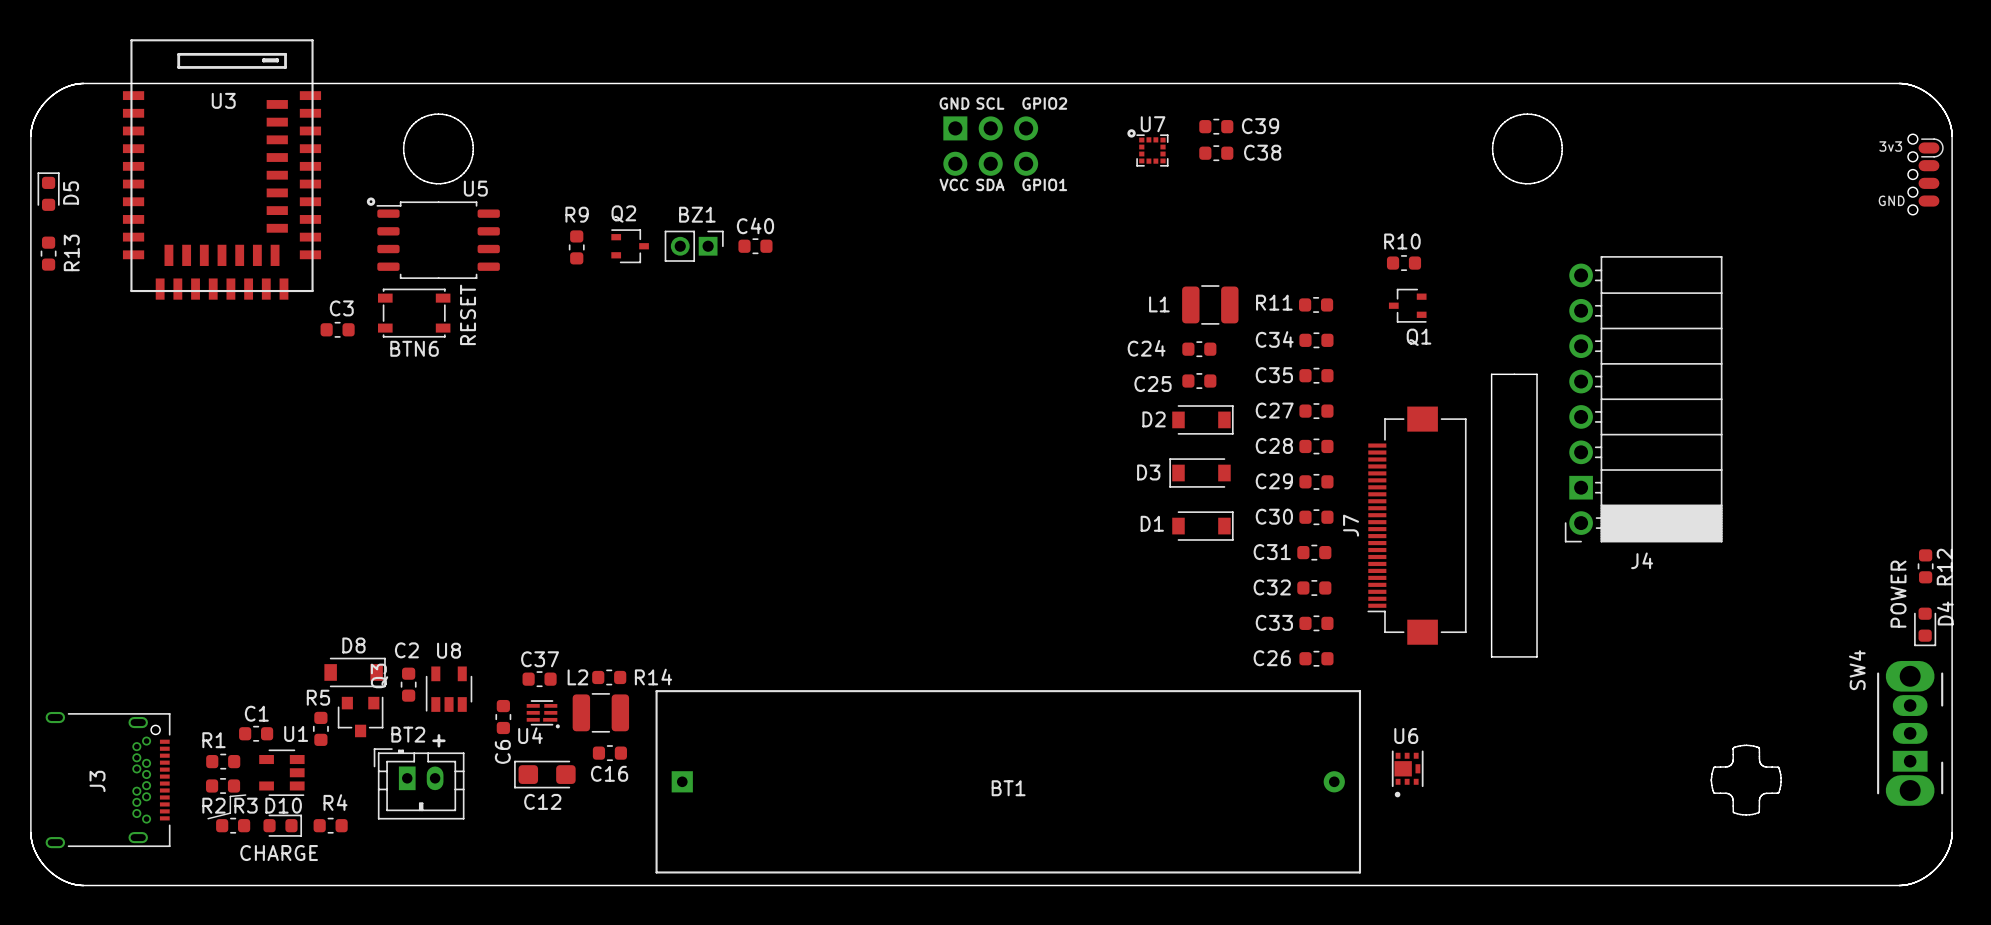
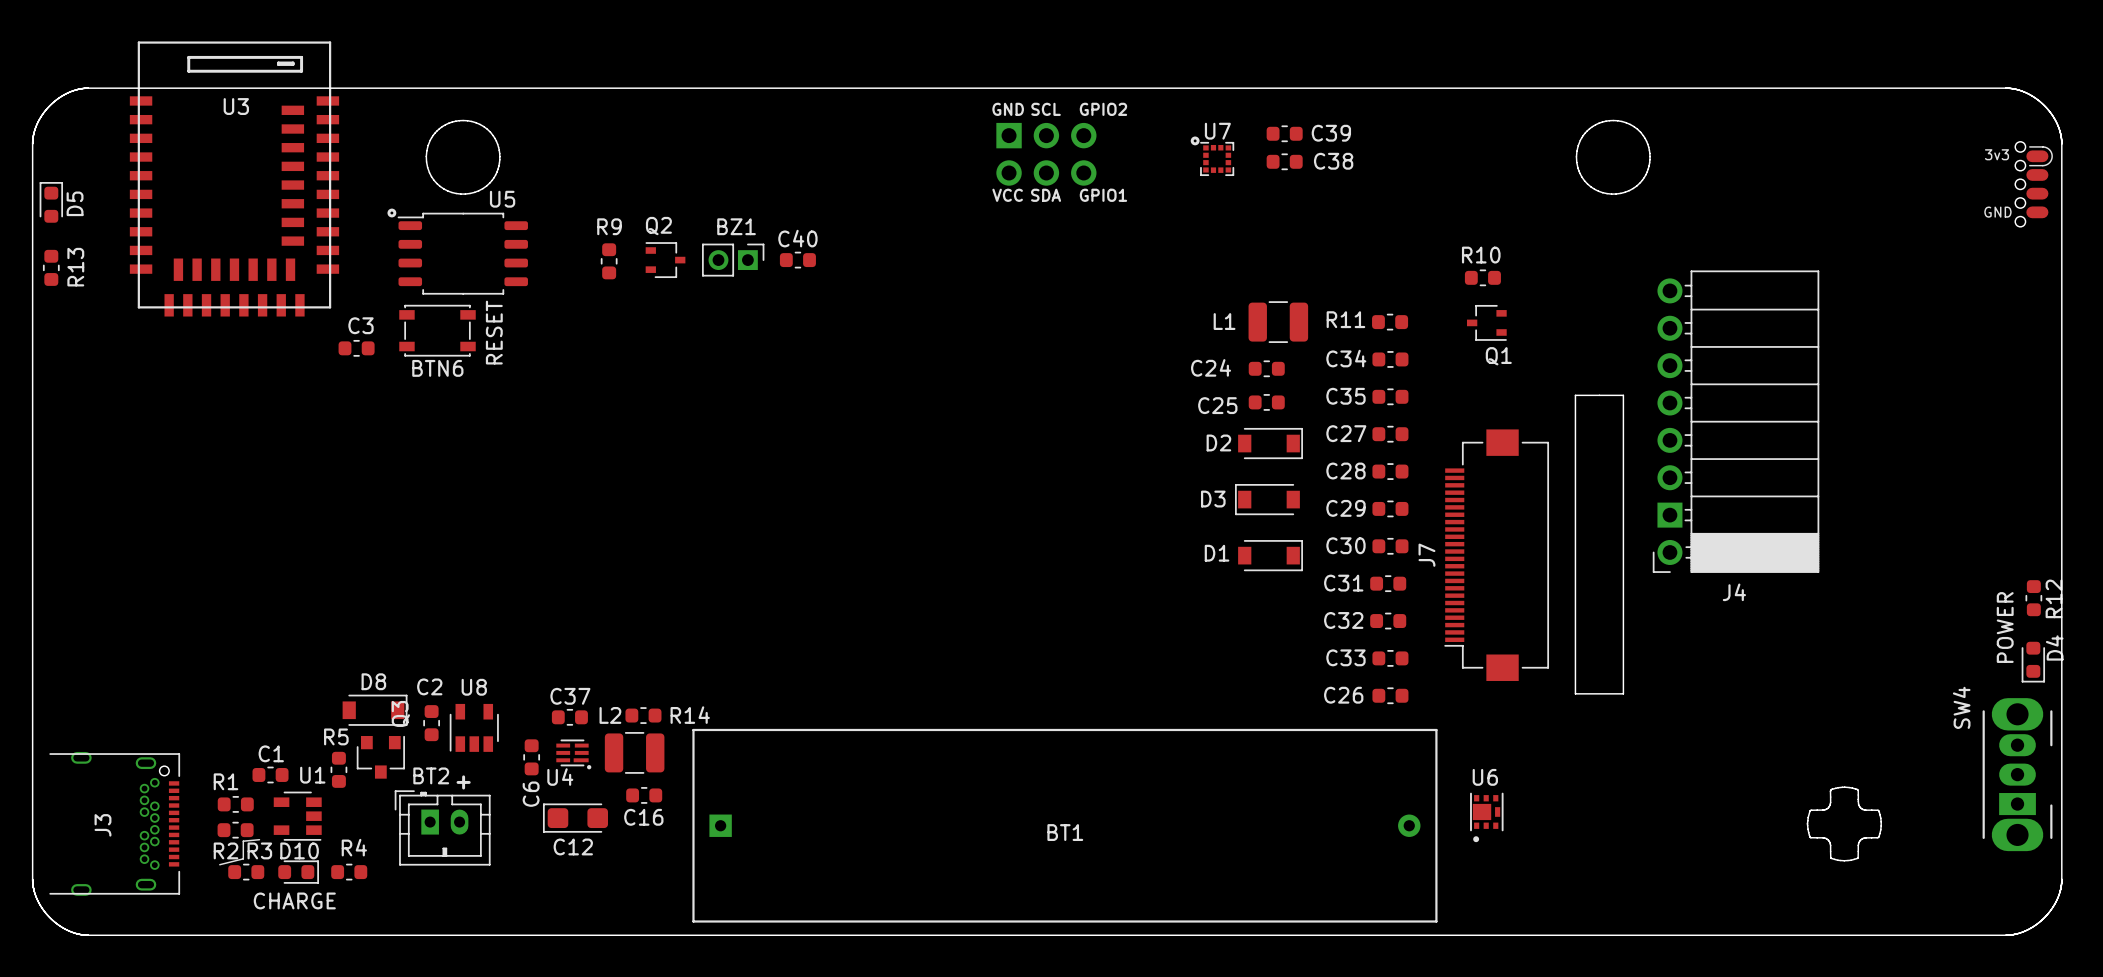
J3 footprint: [45, 711, 171, 849] -> [49, 751, 181, 896]

